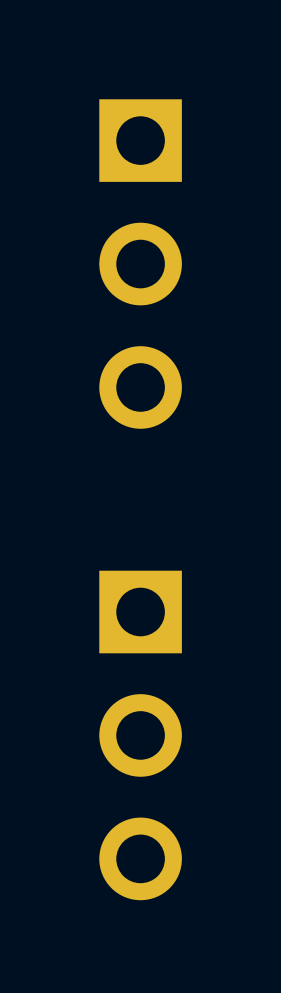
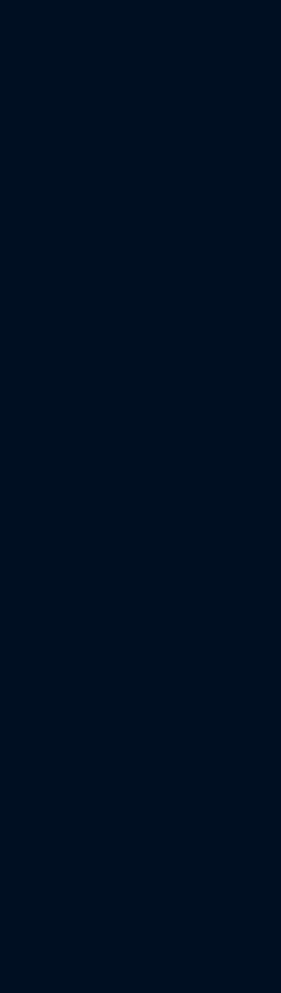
part: (140, 264) -> none
part: (140, 735) -> none

